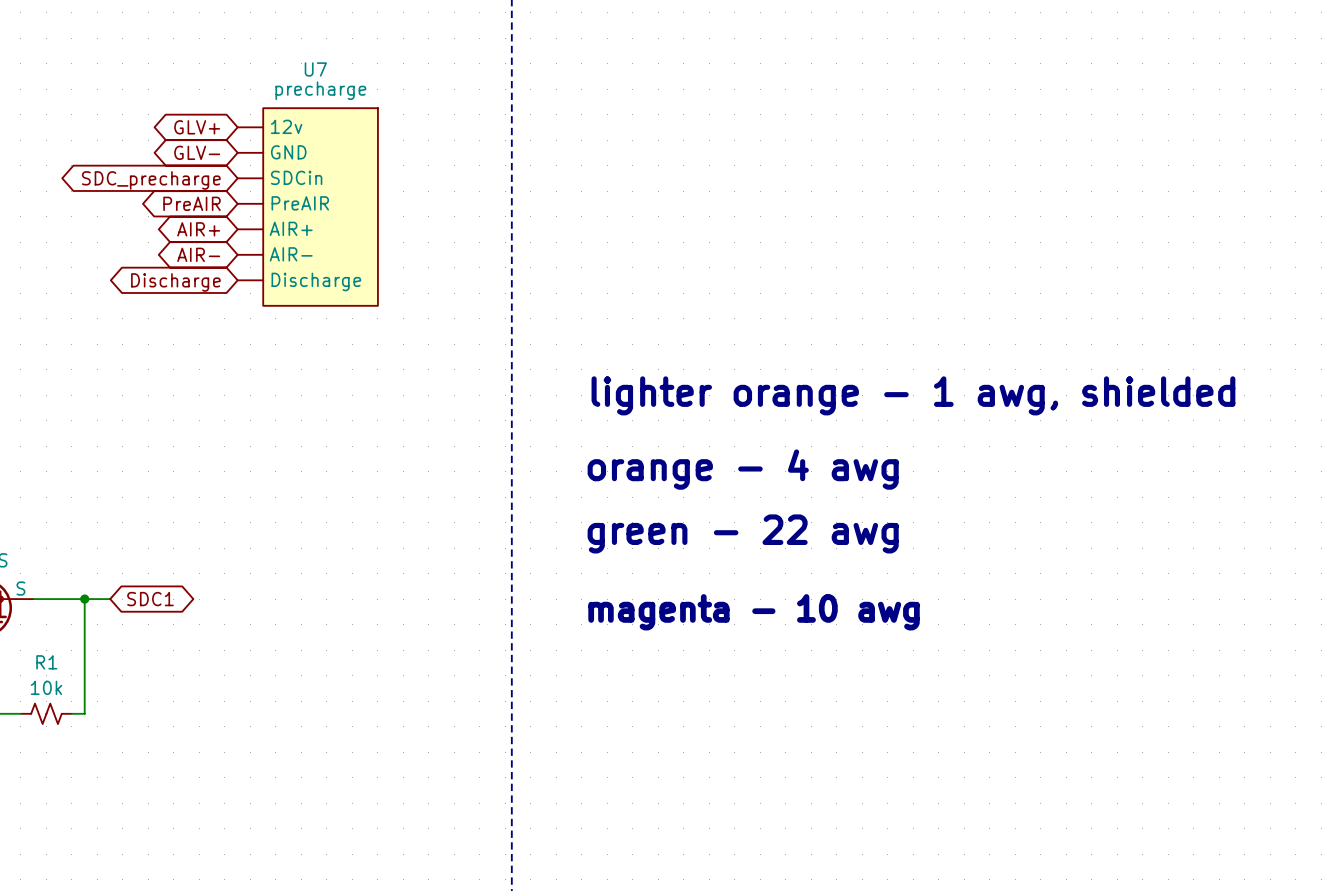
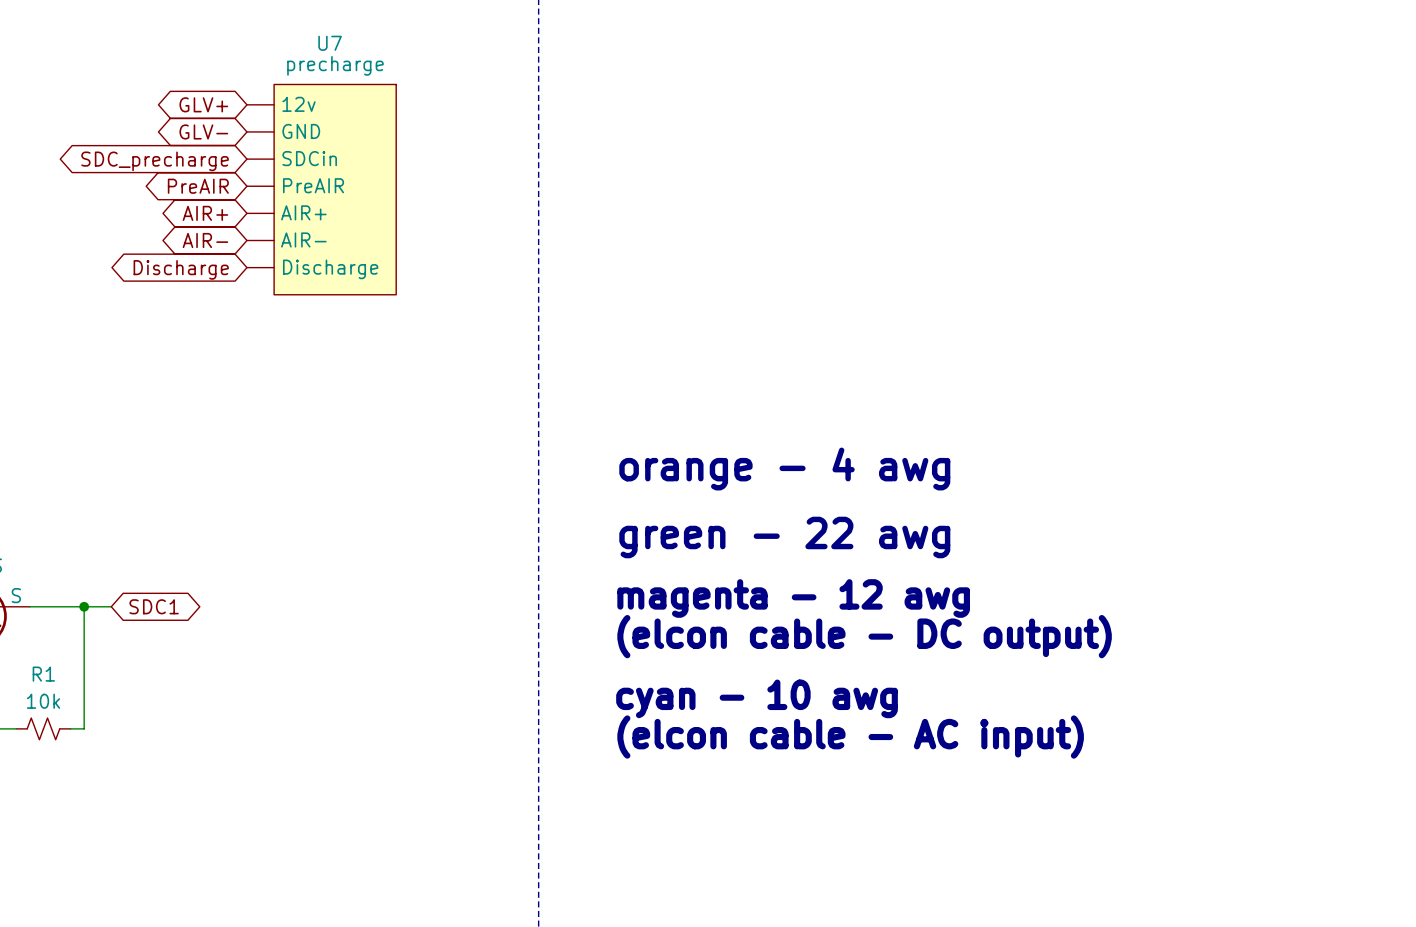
text: lighter orange - 1 awg, shielded (913, 395) -> none
text: magenta - 10 awg (754, 612) -> magenta - 12 awg (793, 598)
text: none -> (elcon cable - DC output) (864, 636)
text: none -> cyan - 10 awg (757, 698)
text: none -> (elcon cable - AC input) (850, 737)

